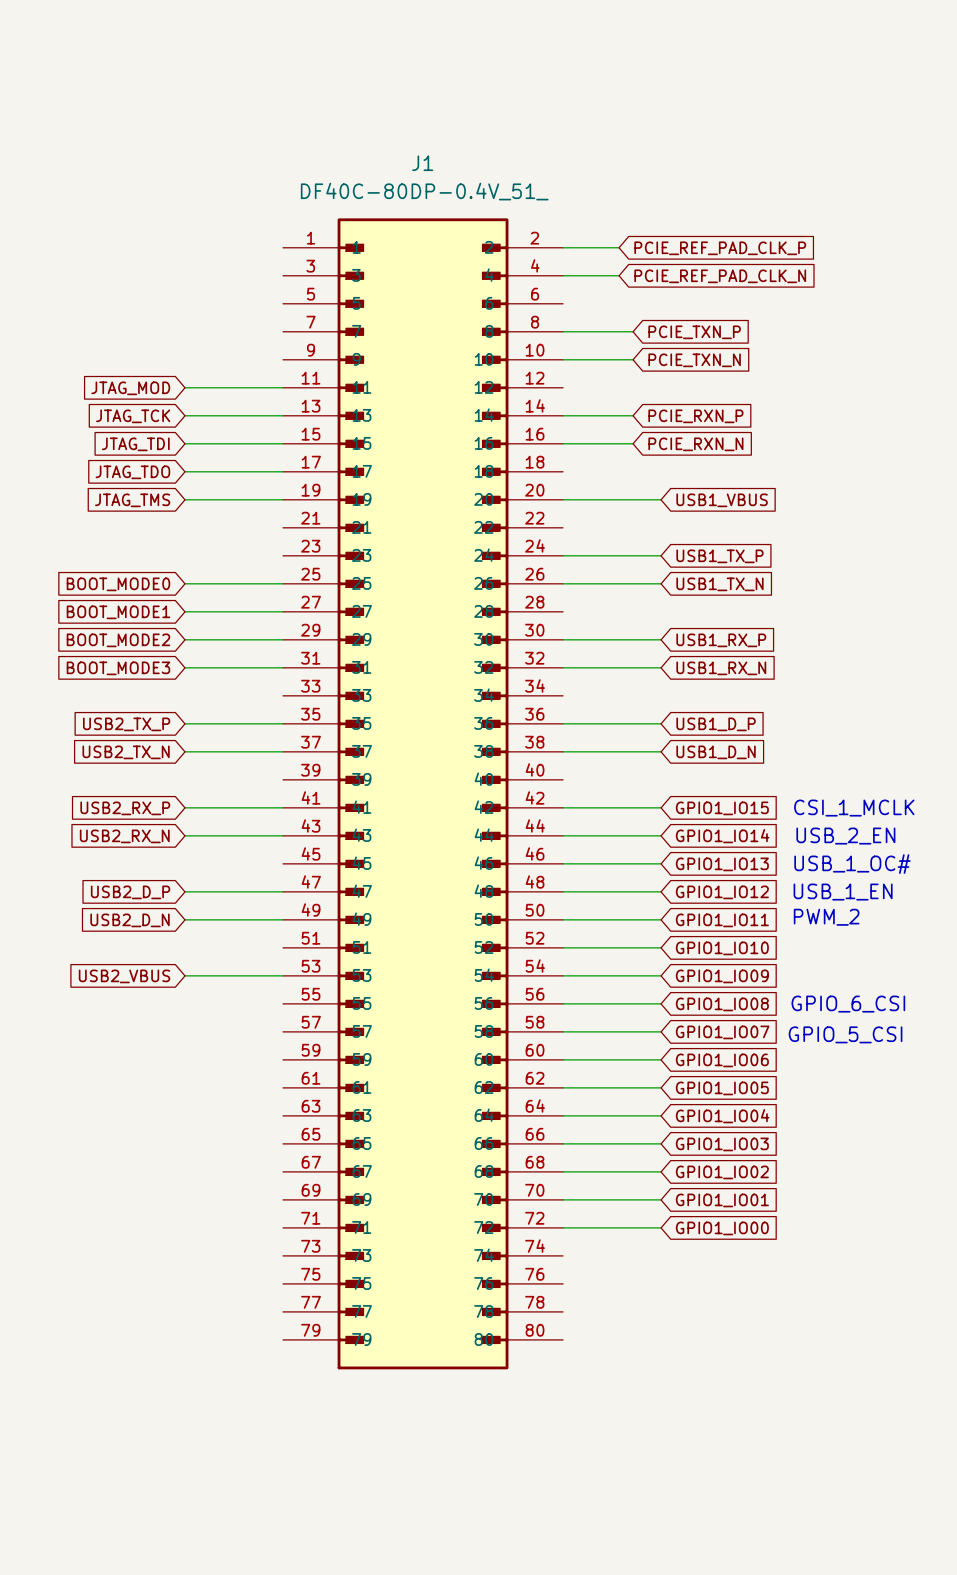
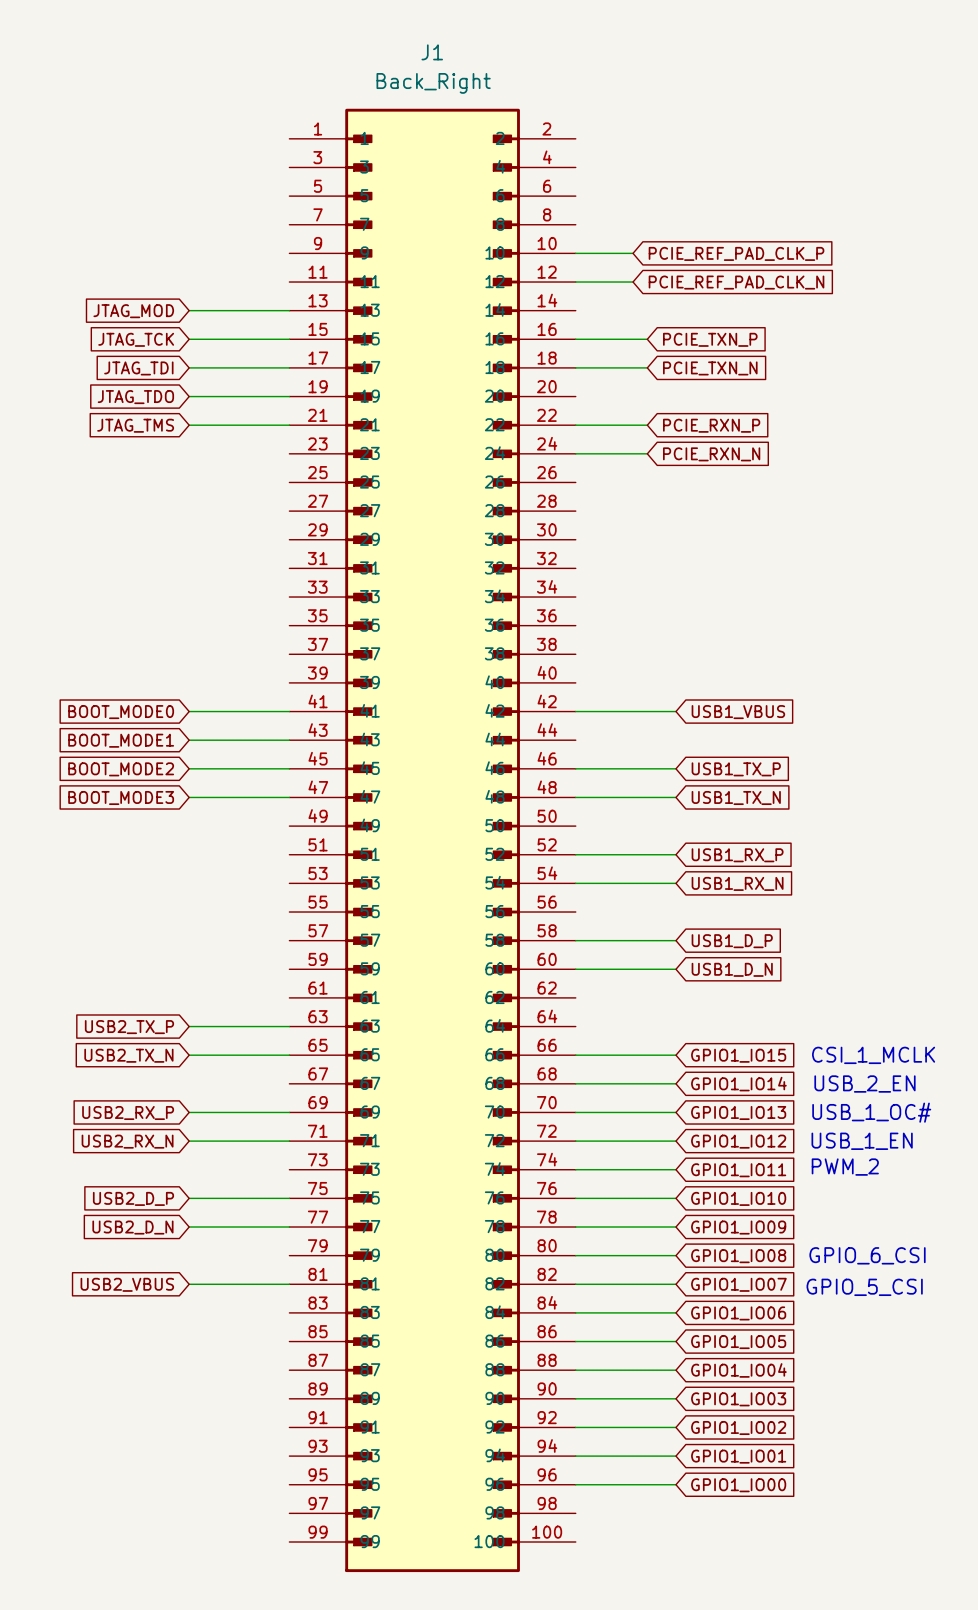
J1 name position: J1 (422, 163) -> J1 (432, 52)
J1 value: DF40C-80DP-0.4V_51_ (424, 191) -> Back_Right (433, 83)
J1 symbol: [283, 218, 564, 1370] -> [289, 108, 576, 1573]
wire: none -> (189, 310) (289, 310)
global label: none -> JTAG_MOD (133, 311)
global label: none -> JTAG_TCK (136, 339)
global label: JTAG_MOD (130, 388) -> JTAG_TDO (135, 397)
global label: JTAG_TCK (133, 416) -> JTAG_TMS (135, 425)
wire: (185, 443) (283, 443) -> (189, 339) (289, 339)
global label position: JTAG_TDI (135, 444) -> JTAG_TDI (138, 368)
wire: (185, 471) (283, 471) -> (189, 367) (289, 367)
global label: JTAG_TDO (132, 472) -> none
wire: (185, 499) (283, 499) -> (189, 711) (289, 711)
wire: (563, 499) (661, 499) -> (575, 711) (675, 711)
global label: JTAG_TMS (132, 500) -> none
global label position: USB1_VBUS (722, 500) -> USB1_VBUS (738, 712)
wire: (563, 555) (661, 555) -> none
global label: USB1_TX_P (719, 556) -> none
wire: (185, 583) (283, 583) -> (189, 797) (289, 797)
wire: (563, 583) (661, 583) -> (575, 797) (675, 797)
global label position: BOOT_MODE0 (118, 584) -> BOOT_MODE0 (121, 712)
global label position: USB1_TX_N (719, 584) -> USB1_TX_N (736, 798)
wire: (185, 611) (283, 611) -> none
global label: BOOT_MODE1 (118, 612) -> none
wire: (185, 639) (283, 639) -> none
wire: (563, 639) (661, 639) -> none
global label: BOOT_MODE2 (118, 640) -> none
global label: USB1_RX_P (721, 640) -> none
wire: (185, 667) (283, 667) -> none
wire: (563, 667) (661, 667) -> none
global label position: BOOT_MODE3 (118, 668) -> BOOT_MODE3 (121, 798)
global label: USB1_RX_N (721, 668) -> none
wire: (563, 723) (661, 723) -> none
global label: USB2_TX_P (126, 724) -> BOOT_MODE1 (121, 740)
global label: USB1_D_P (716, 724) -> none
global label: USB2_TX_N (126, 752) -> BOOT_MODE2 (121, 769)
global label: USB1_D_N (716, 752) -> USB1_TX_P (736, 769)
wire: (185, 807) (283, 807) -> (189, 1026) (289, 1026)
wire: (563, 807) (661, 807) -> none
global label: USB2_RX_P (125, 808) -> none
global label: GPIO1_IO15 (722, 808) -> none
text position: CSI_1_MCLK (854, 808) -> CSI_1_MCLK (873, 1055)
wire: (185, 835) (283, 835) -> (189, 1055) (289, 1055)
global label: USB2_RX_N (124, 836) -> none
global label: GPIO1_IO14 (722, 836) -> USB1_RX_P (737, 855)
text position: USB_2_EN (845, 836) -> USB_2_EN (864, 1084)
global label: GPIO1_IO13 (722, 864) -> USB1_RX_N (737, 883)
text position: USB_1_OC# (852, 864) -> USB_1_OC# (871, 1112)
wire: (185, 891) (283, 891) -> (189, 1112) (289, 1112)
wire: (563, 891) (661, 891) -> none
global label: USB2_D_P (130, 892) -> none
global label: GPIO1_IO12 (722, 892) -> none
text position: USB_1_EN (843, 892) -> USB_1_EN (862, 1141)
text position: PWM_2 (826, 917) -> PWM_2 (845, 1167)
wire: (185, 919) (283, 919) -> (189, 1141) (289, 1141)
global label: USB2_D_N (130, 920) -> none
global label: GPIO1_IO11 (722, 920) -> USB1_D_P (732, 941)
global label: GPIO1_IO10 (722, 948) -> USB1_D_N (732, 969)
wire: (185, 975) (283, 975) -> (189, 1198) (289, 1198)
wire: (563, 975) (661, 975) -> none
global label: USB2_VBUS (124, 976) -> none
global label: GPIO1_IO09 (722, 976) -> none
wire: (563, 1003) (661, 1003) -> (575, 1284) (675, 1284)
global label: none -> USB2_TX_P (129, 1027)
global label: GPIO1_IO08 (722, 1004) -> none
text position: GPIO_6_CSI (848, 1004) -> GPIO_6_CSI (867, 1255)
global label: none -> USB2_TX_N (128, 1055)
global label: GPIO1_IO07 (722, 1032) -> GPIO1_IO15 (738, 1055)
text position: GPIO_5_CSI (845, 1034) -> GPIO_5_CSI (864, 1287)
global label: GPIO1_IO06 (722, 1060) -> GPIO1_IO14 (738, 1084)
global label: none -> USB2_RX_P (128, 1112)
global label: GPIO1_IO05 (722, 1088) -> GPIO1_IO13 (738, 1112)
global label: none -> USB2_RX_N (127, 1141)
global label: GPIO1_IO04 (722, 1116) -> GPIO1_IO12 (738, 1141)
global label: GPIO1_IO03 (722, 1144) -> GPIO1_IO11 (738, 1170)
global label: none -> USB2_D_P (133, 1198)
global label: GPIO1_IO02 (722, 1172) -> GPIO1_IO10 (738, 1198)
wire: none -> (189, 1227) (289, 1227)
global label: none -> USB2_D_N (132, 1227)
global label: GPIO1_IO01 (722, 1200) -> GPIO1_IO09 (738, 1227)
global label: GPIO1_IO00 (722, 1228) -> GPIO1_IO08 (738, 1256)
wire: none -> (189, 1284) (289, 1284)
global label: none -> USB2_VBUS (127, 1284)
global label: none -> GPIO1_IO07 (738, 1284)
wire: none -> (575, 1312) (675, 1312)
global label: none -> GPIO1_IO06 (738, 1313)
wire: none -> (575, 1341) (675, 1341)
global label: none -> GPIO1_IO05 (738, 1342)
wire: none -> (575, 1370) (675, 1370)
global label: none -> GPIO1_IO04 (738, 1370)
wire: none -> (575, 1398) (675, 1398)
global label: none -> GPIO1_IO03 (738, 1399)
wire: none -> (575, 1427) (675, 1427)
global label: none -> GPIO1_IO02 (738, 1427)
wire: none -> (575, 1456) (675, 1456)
global label: none -> GPIO1_IO01 (738, 1456)
wire: none -> (575, 1484) (675, 1484)
global label: none -> GPIO1_IO00 (738, 1485)

